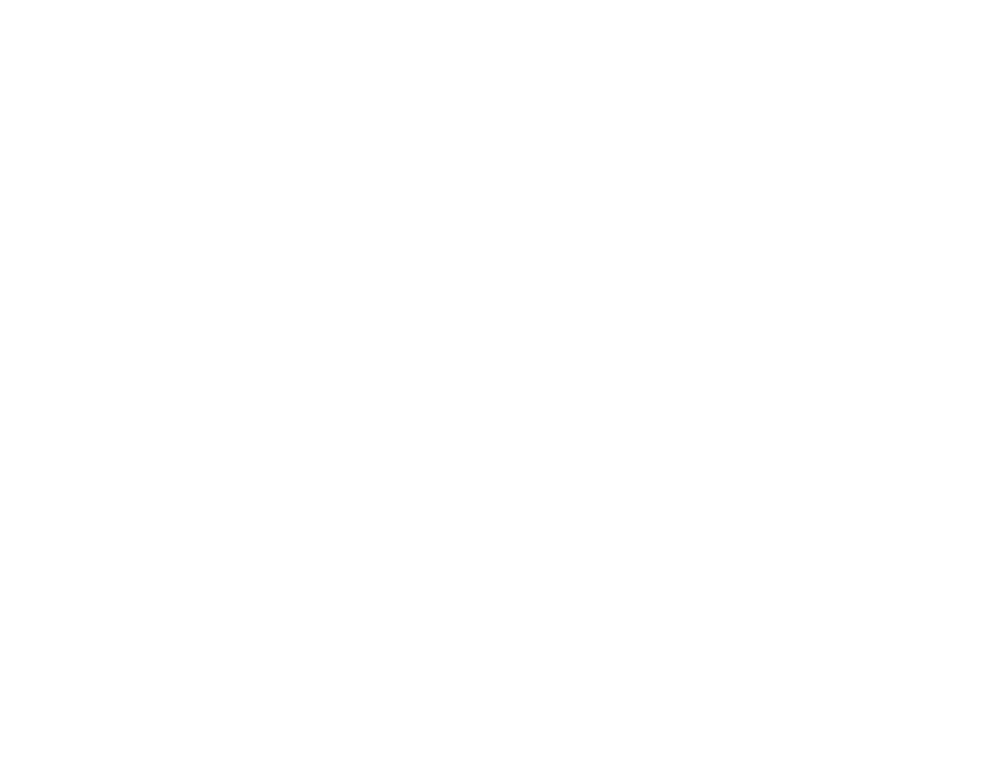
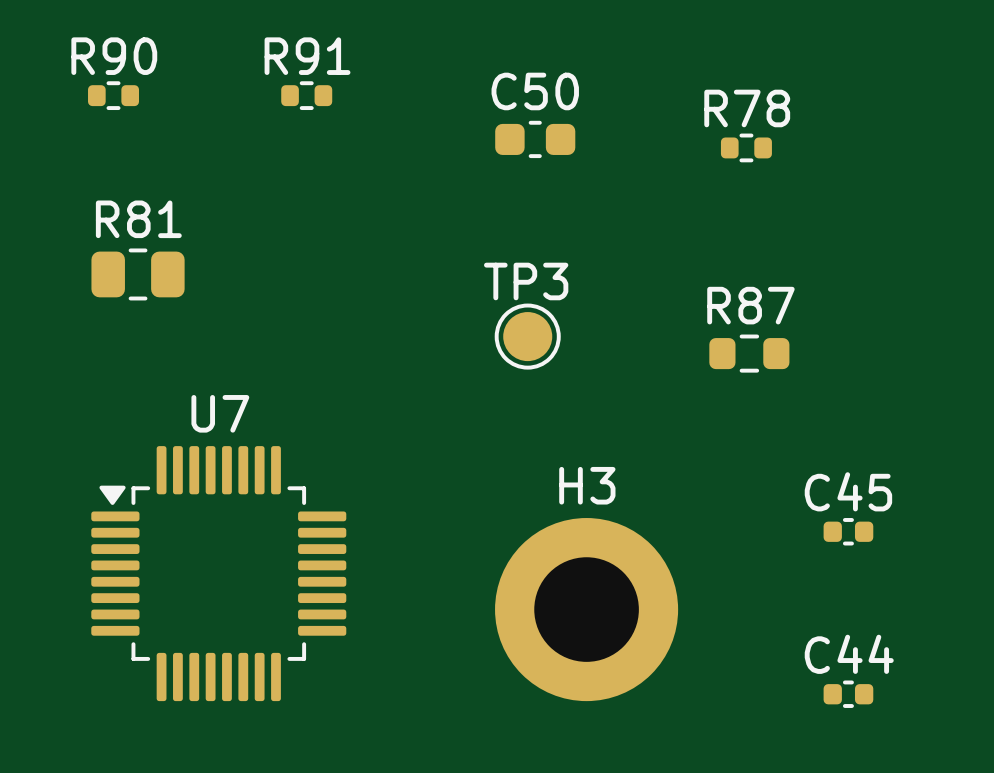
R90: none -> (113, 95)
R91: none -> (306, 95)
C50: none -> (535, 139)
R78: none -> (746, 147)
R81: none -> (138, 274)
TP3: none -> (527, 336)
R87: none -> (749, 353)
C45: none -> (848, 531)
U7: none -> (218, 573)
H3: none -> (586, 609)
C44: none -> (848, 694)

